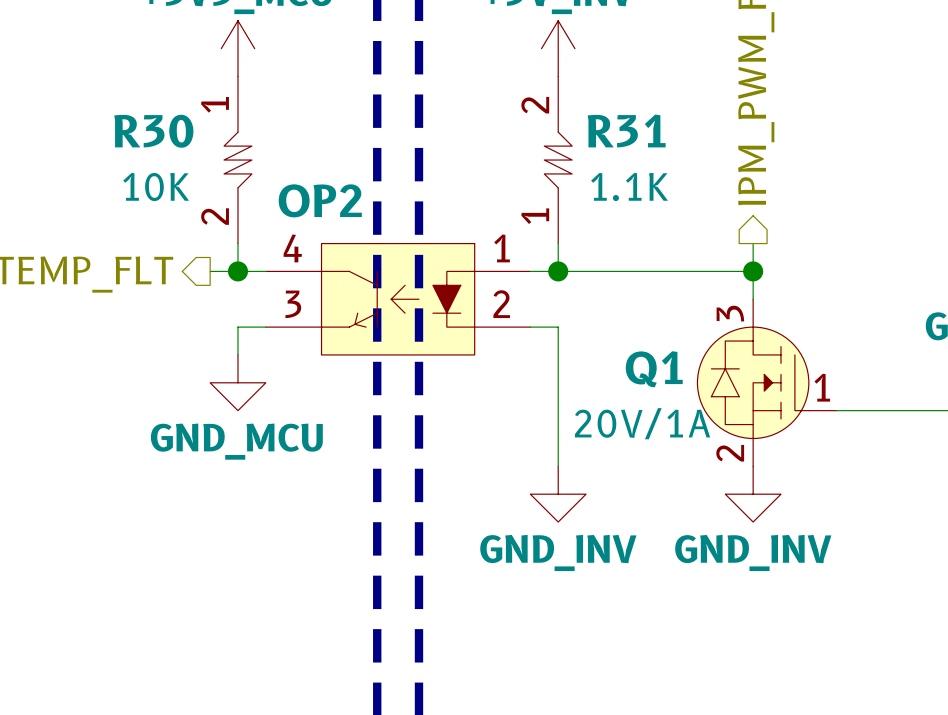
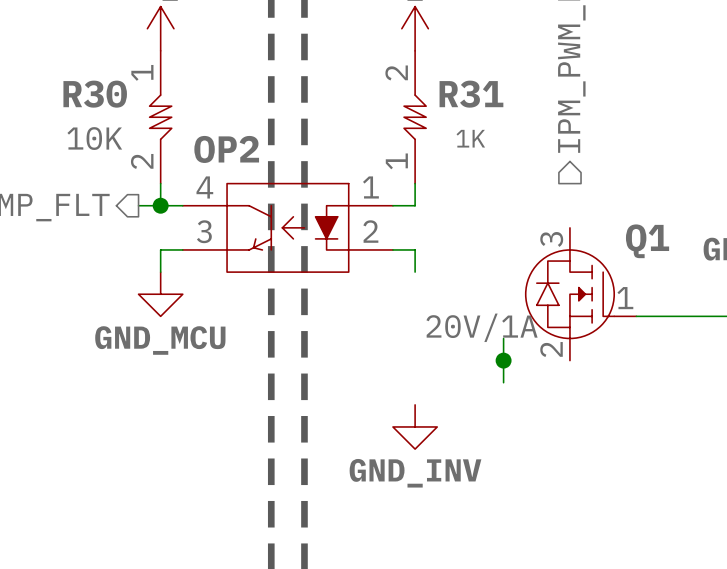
R31 value: 1.1K (629, 186) -> 1K (470, 138)
wire: (753, 243) (753, 299) -> (503, 338) (503, 382)
wire: (558, 271) (753, 271) -> none
junction: (558, 271) -> none
junction: (753, 271) -> none
wire: (558, 354) (558, 466) -> none
Q1 name position: Q1 (654, 369) -> Q1 (647, 241)
junction: none -> (503, 360)
power symbol position: GND_INV (558, 494) -> GND_INV (415, 426)
power symbol: GND_INV (753, 494) -> none

